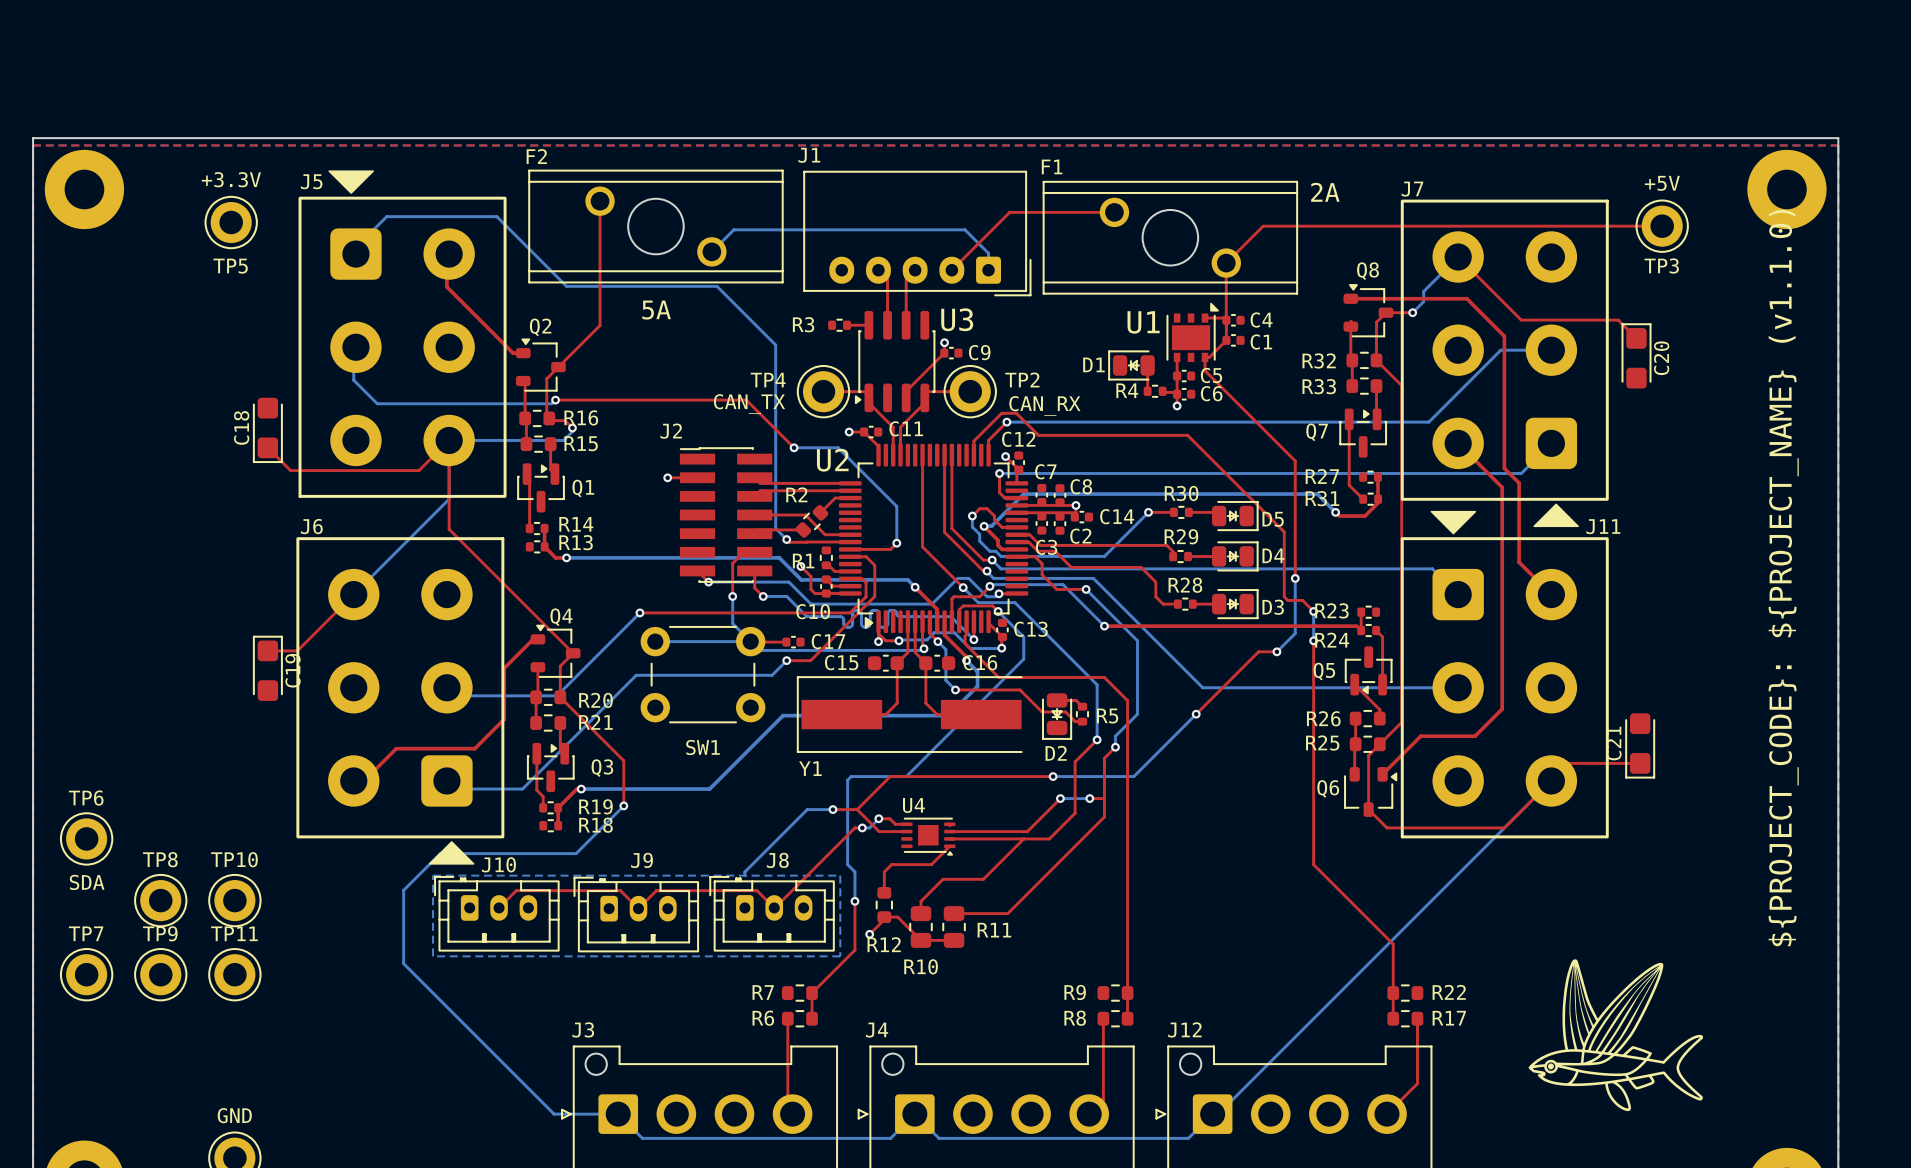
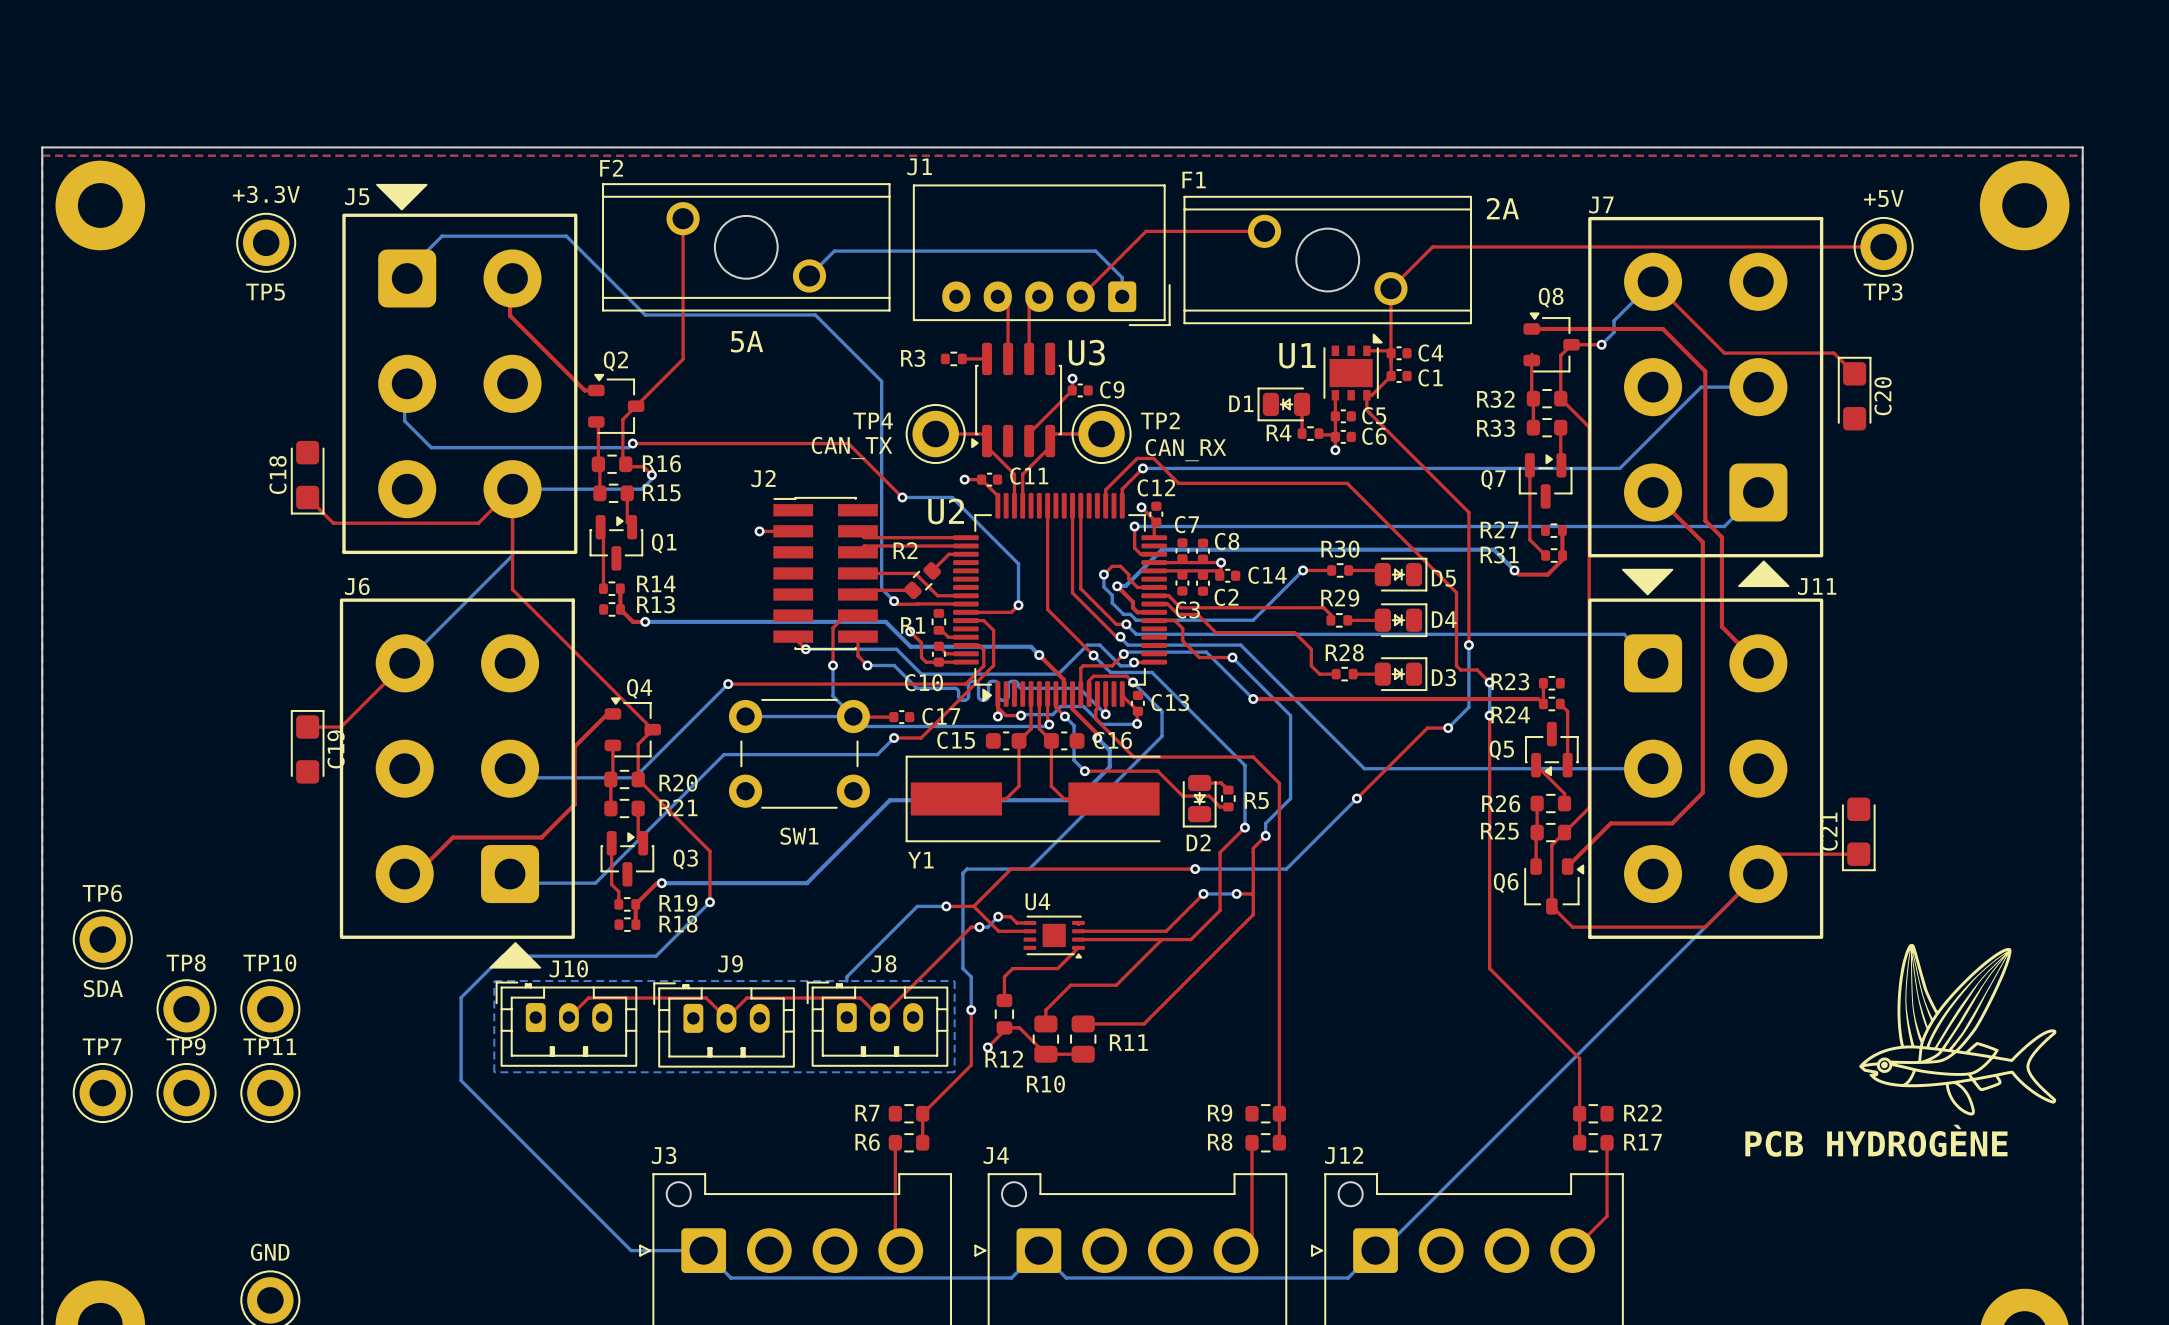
text: ${PROJECT_CODE}: ${PROJECT_NAME} (v1.1.0) (1783, 578) -> none
text: none -> PCB HYDROGÈNE (1876, 1140)
drawing position: (1615, 1035) -> (1957, 1029)
drawing position: (1550, 1066) -> (1884, 1064)

